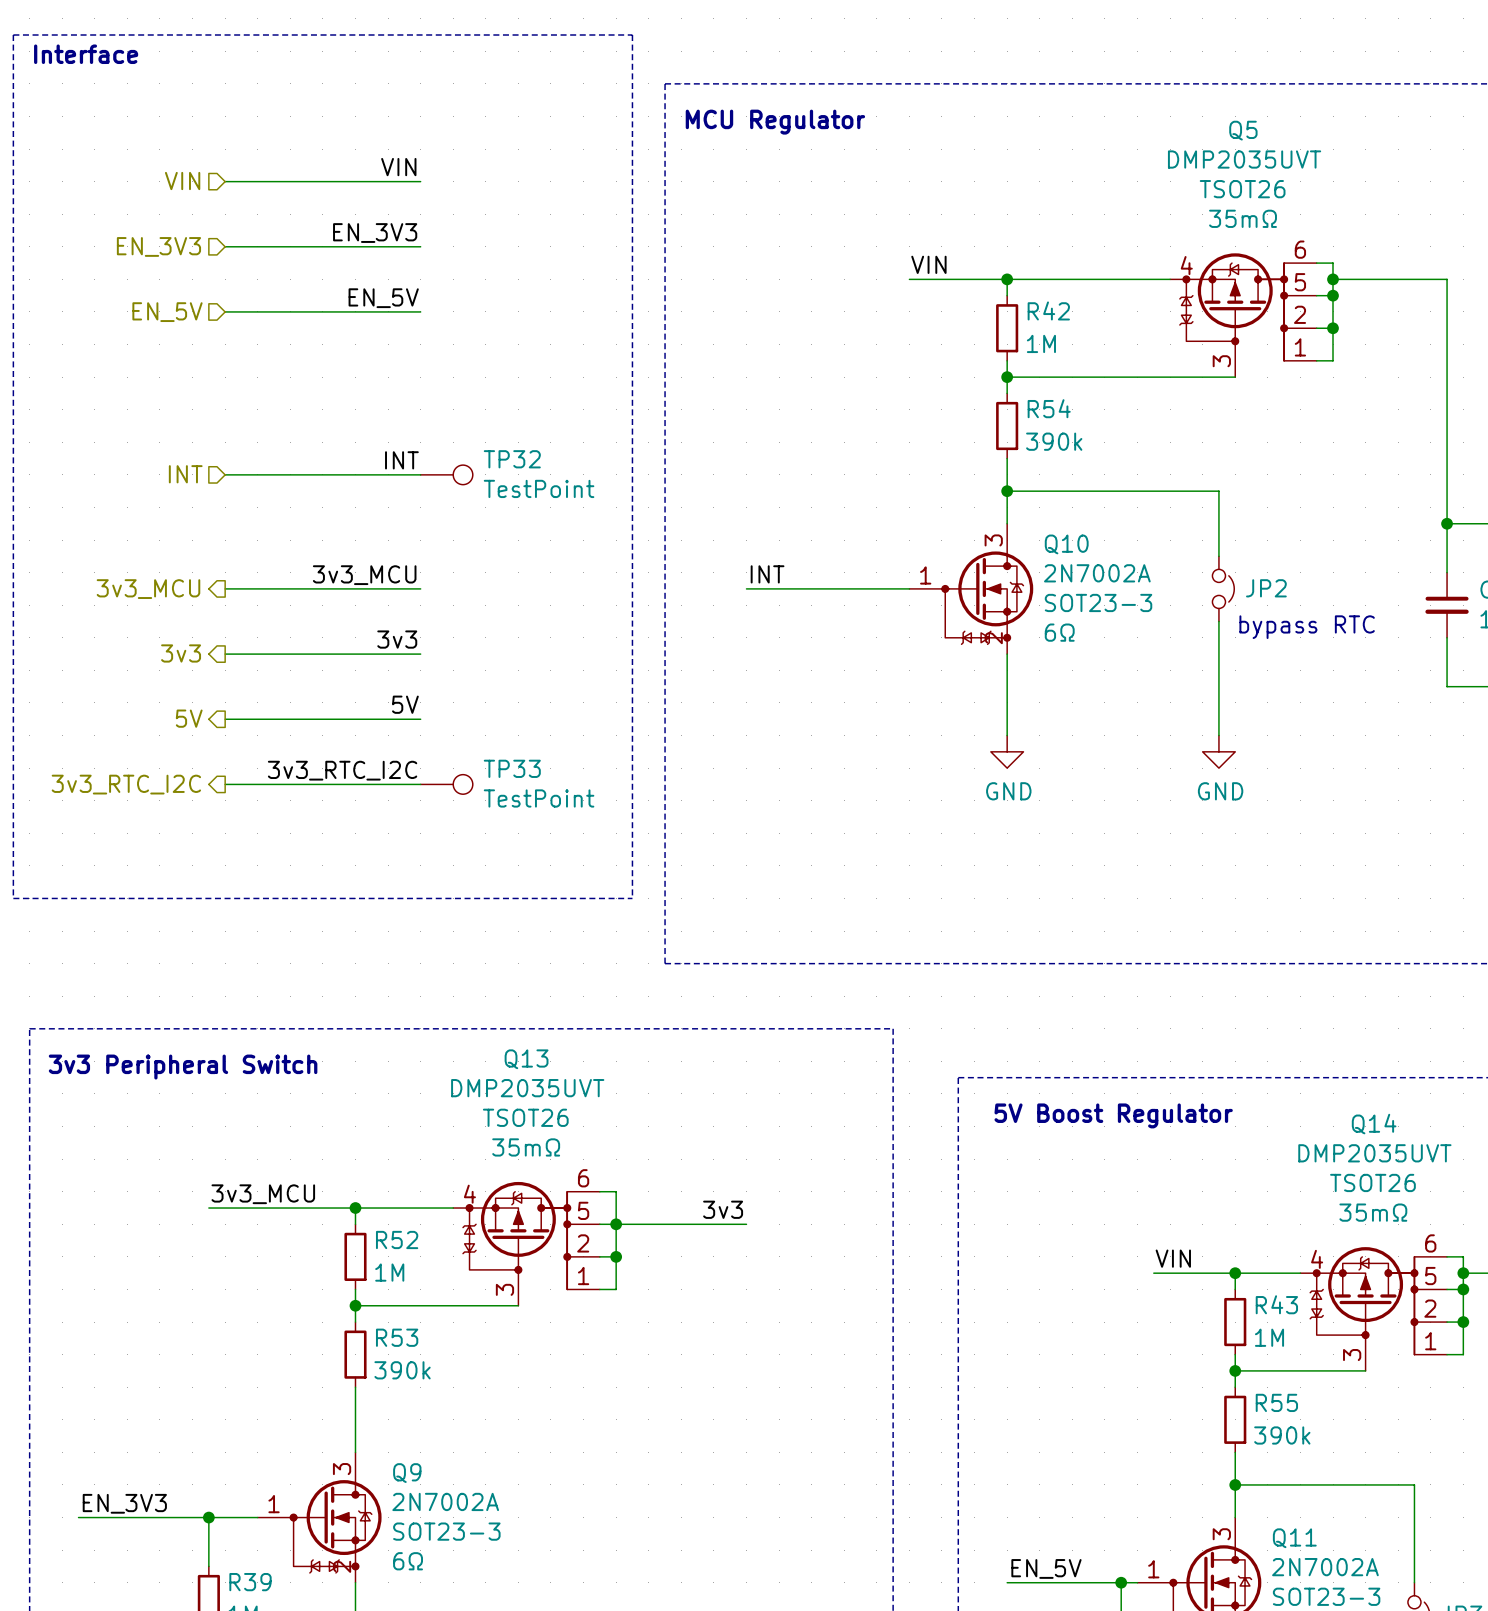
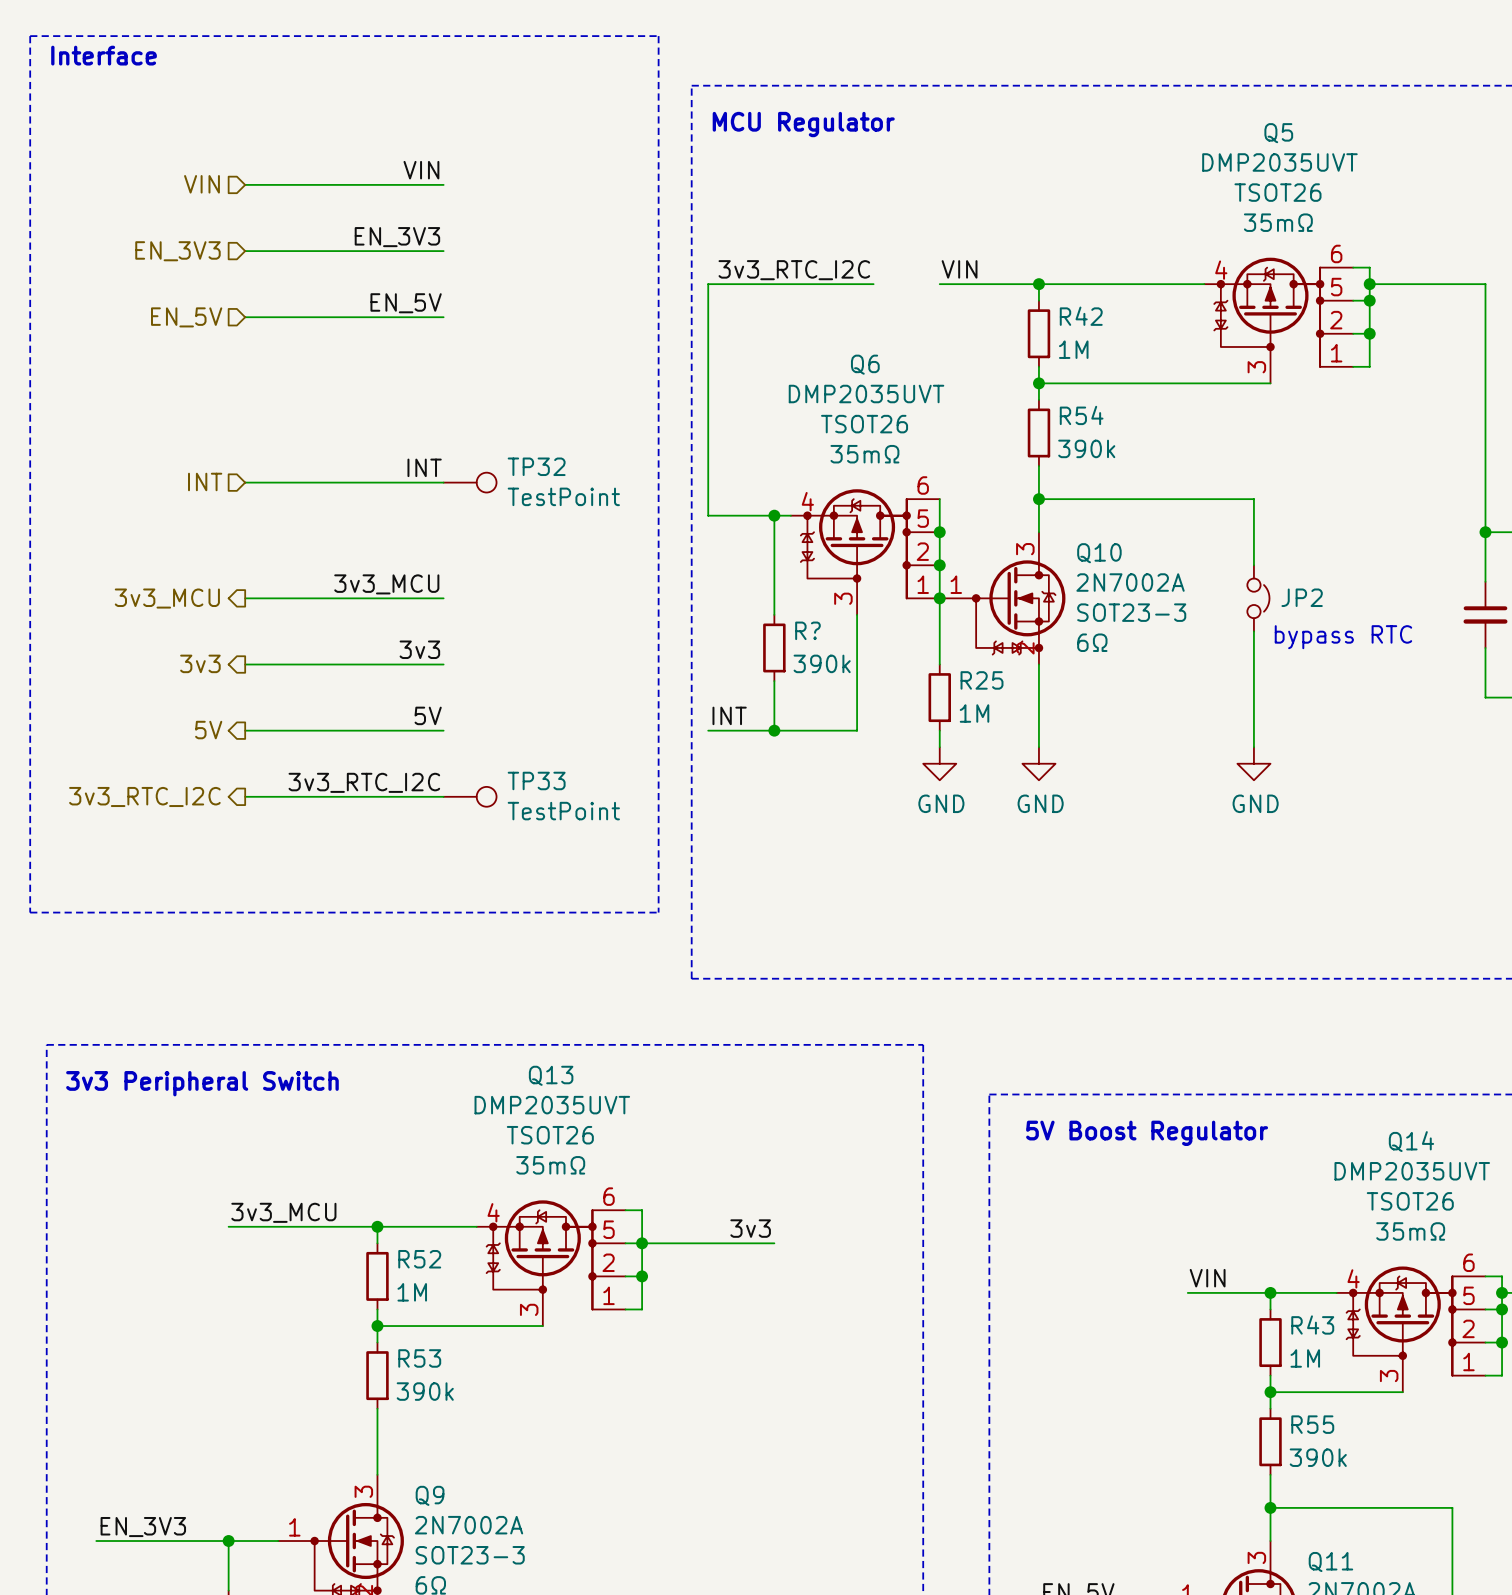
label: none -> 3v3_RTC_I2C (794, 270)
wire: none -> (873, 284) (708, 284) (708, 515) (790, 515)
wire: none -> (939, 499) (939, 664)
wire: none -> (774, 515) (774, 614)
junction: none -> (774, 515)
junction: none -> (939, 532)
Q6: none -> DMP2035UVT (865, 552)
junction: none -> (939, 565)
label position: INT (767, 574) -> INT (729, 715)
wire: (746, 588) (909, 588) -> none
junction: none -> (939, 598)
wire: none -> (857, 614) (857, 730) (708, 730)
R?: none -> 390k (774, 647)
wire: none -> (774, 681) (774, 730)
R25: none -> 1M (939, 697)
junction: none -> (774, 730)
wire: none -> (939, 730) (939, 747)
power symbol: none -> GND (939, 763)

